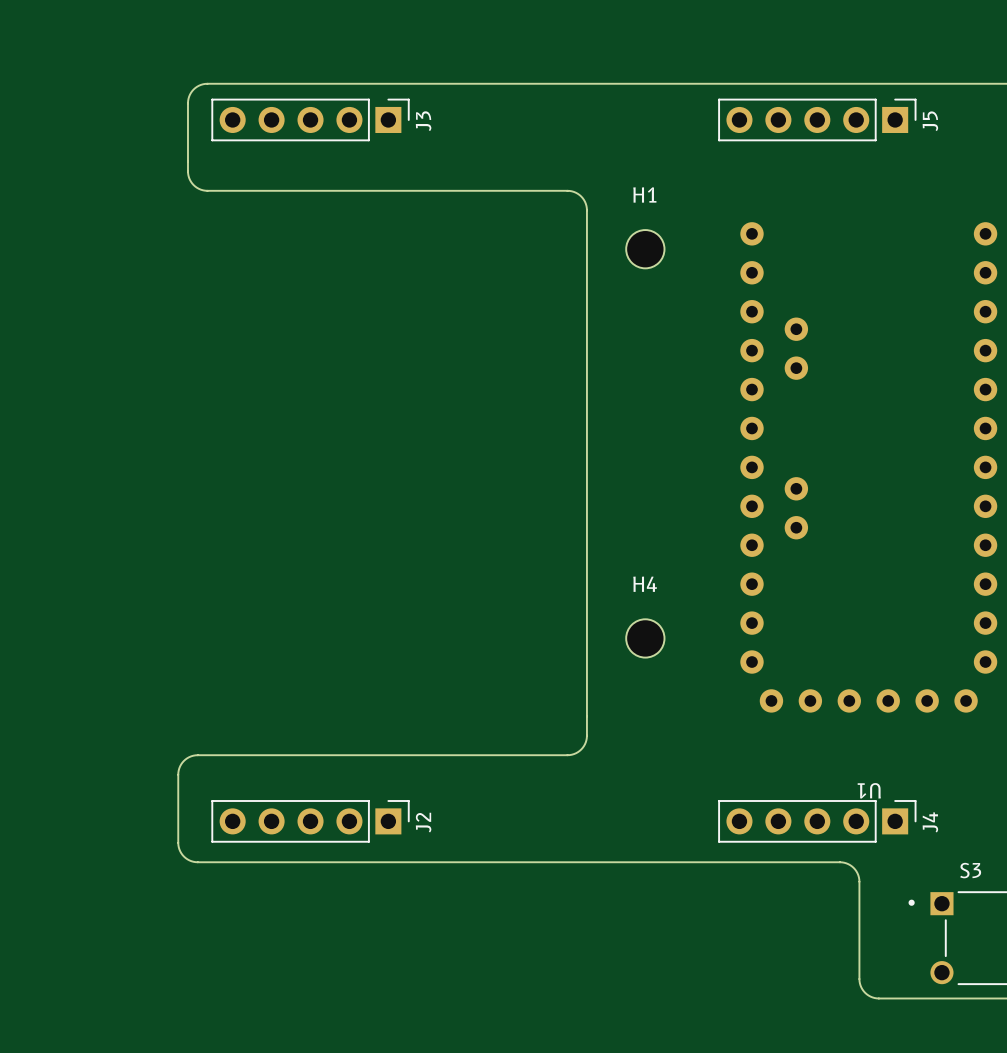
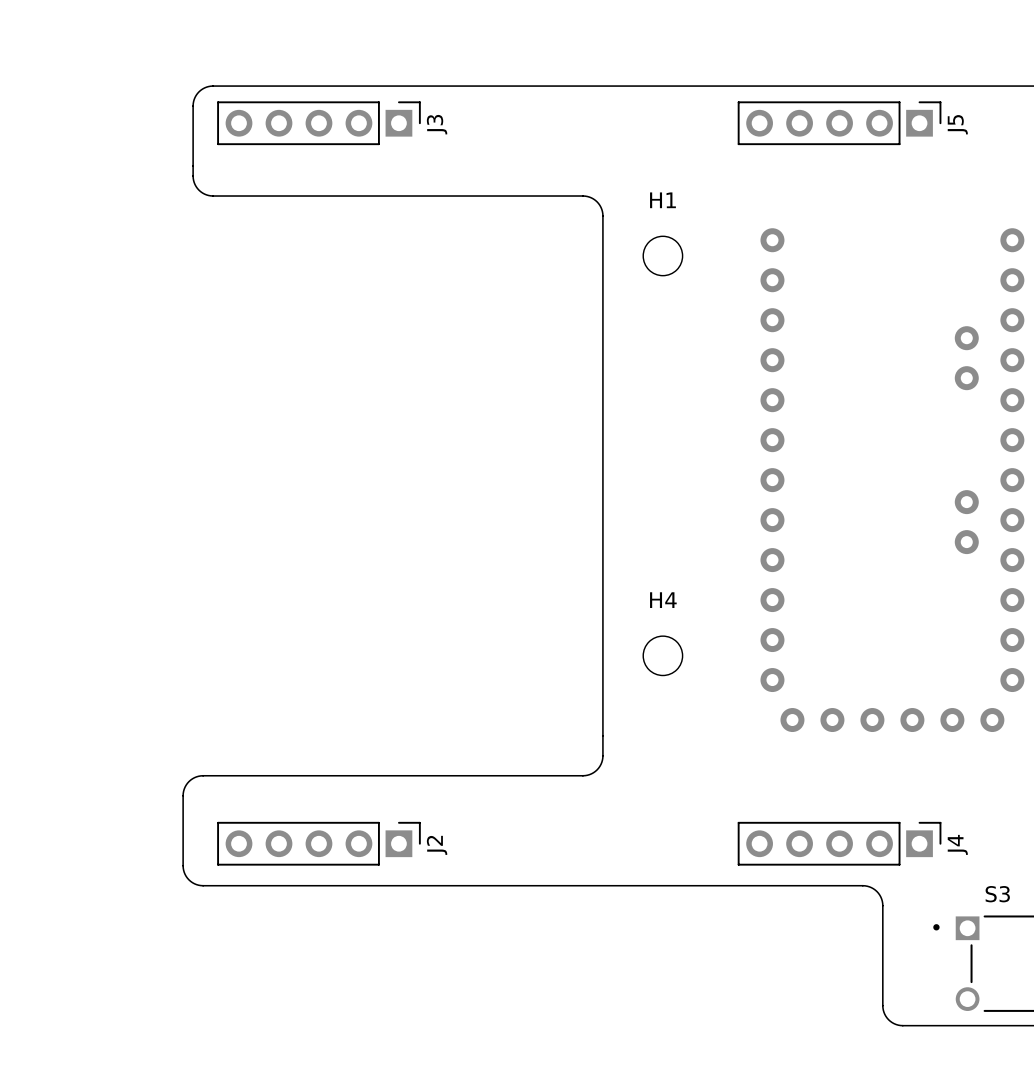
U1 side: top (868, 467) -> bottom (892, 480)

